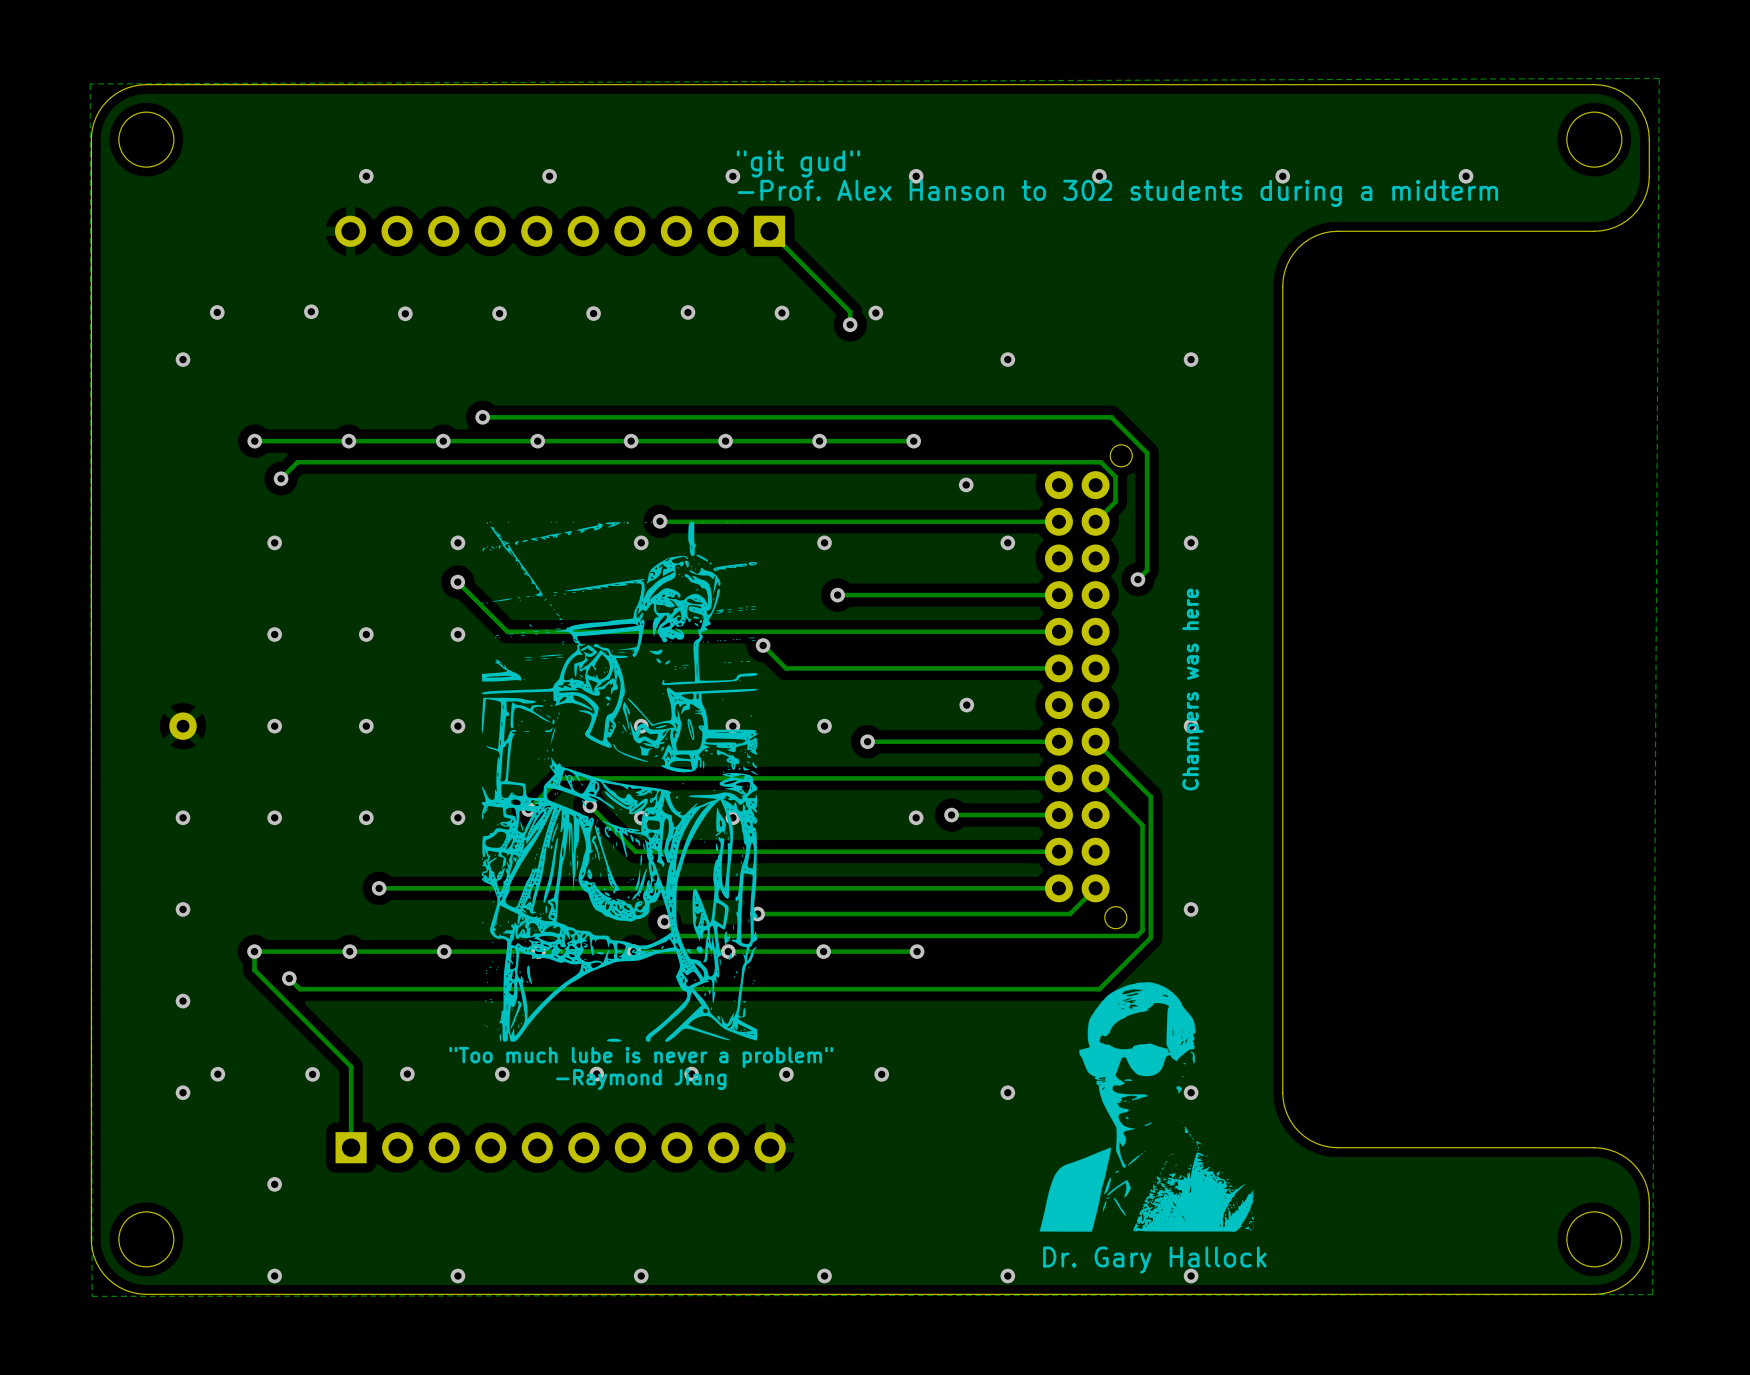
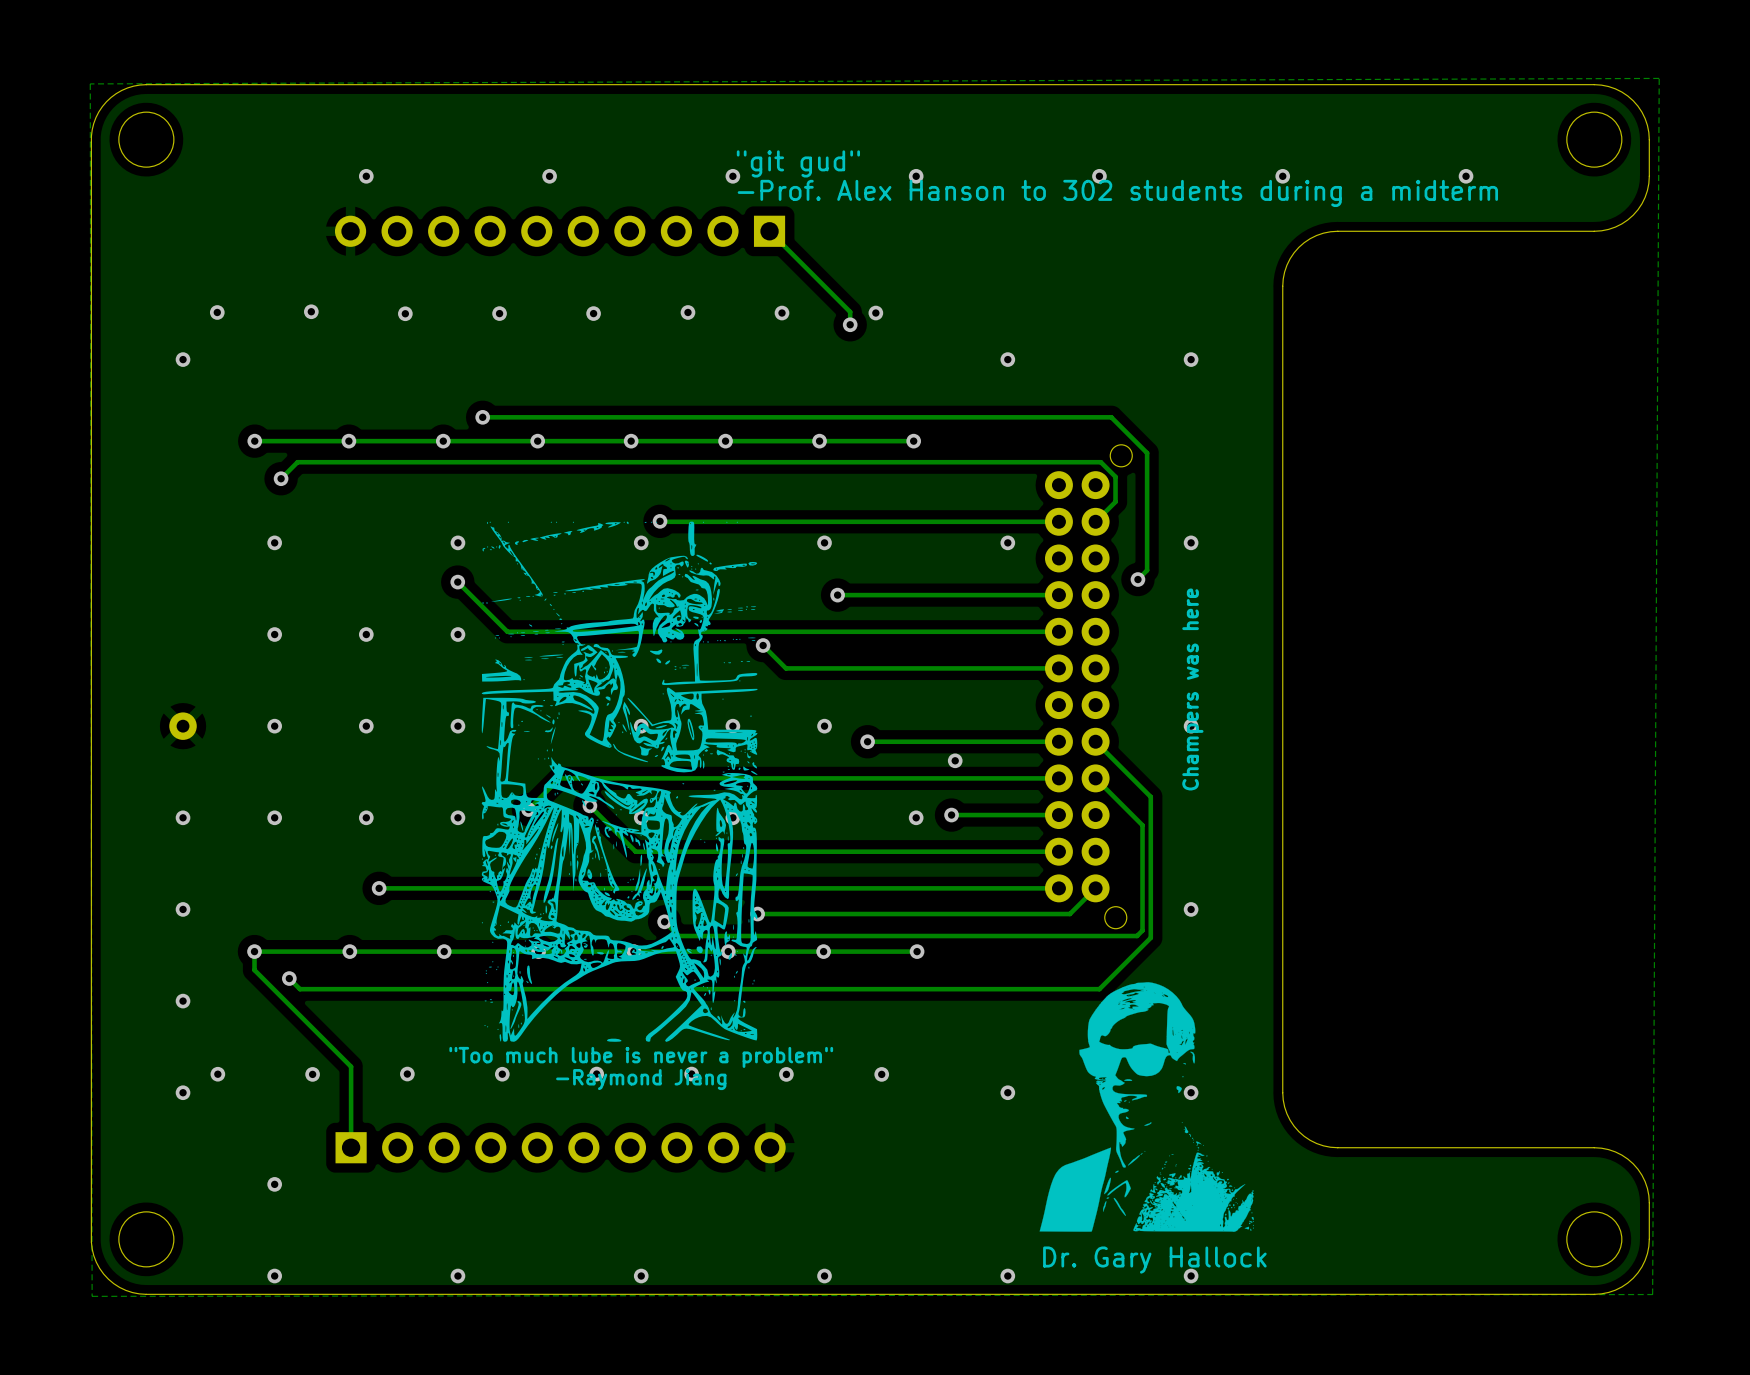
via: (966, 484) -> none
via position: (966, 705) -> (955, 760)

